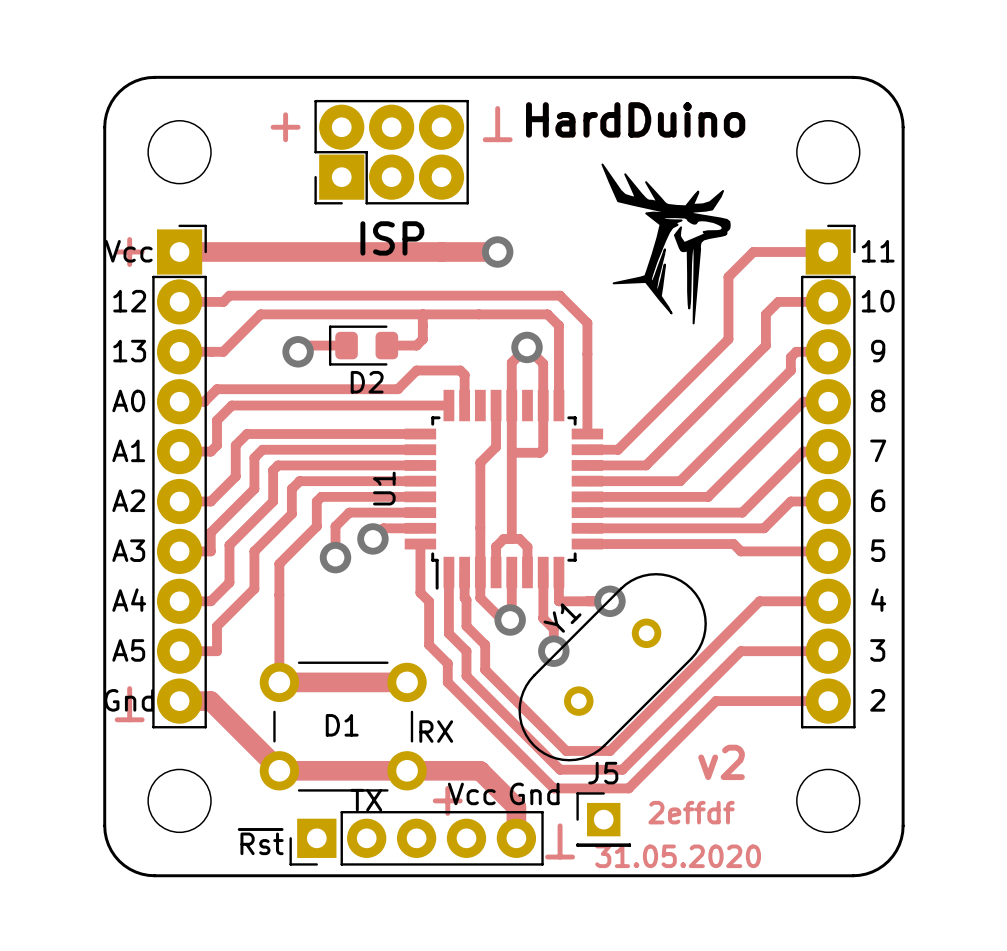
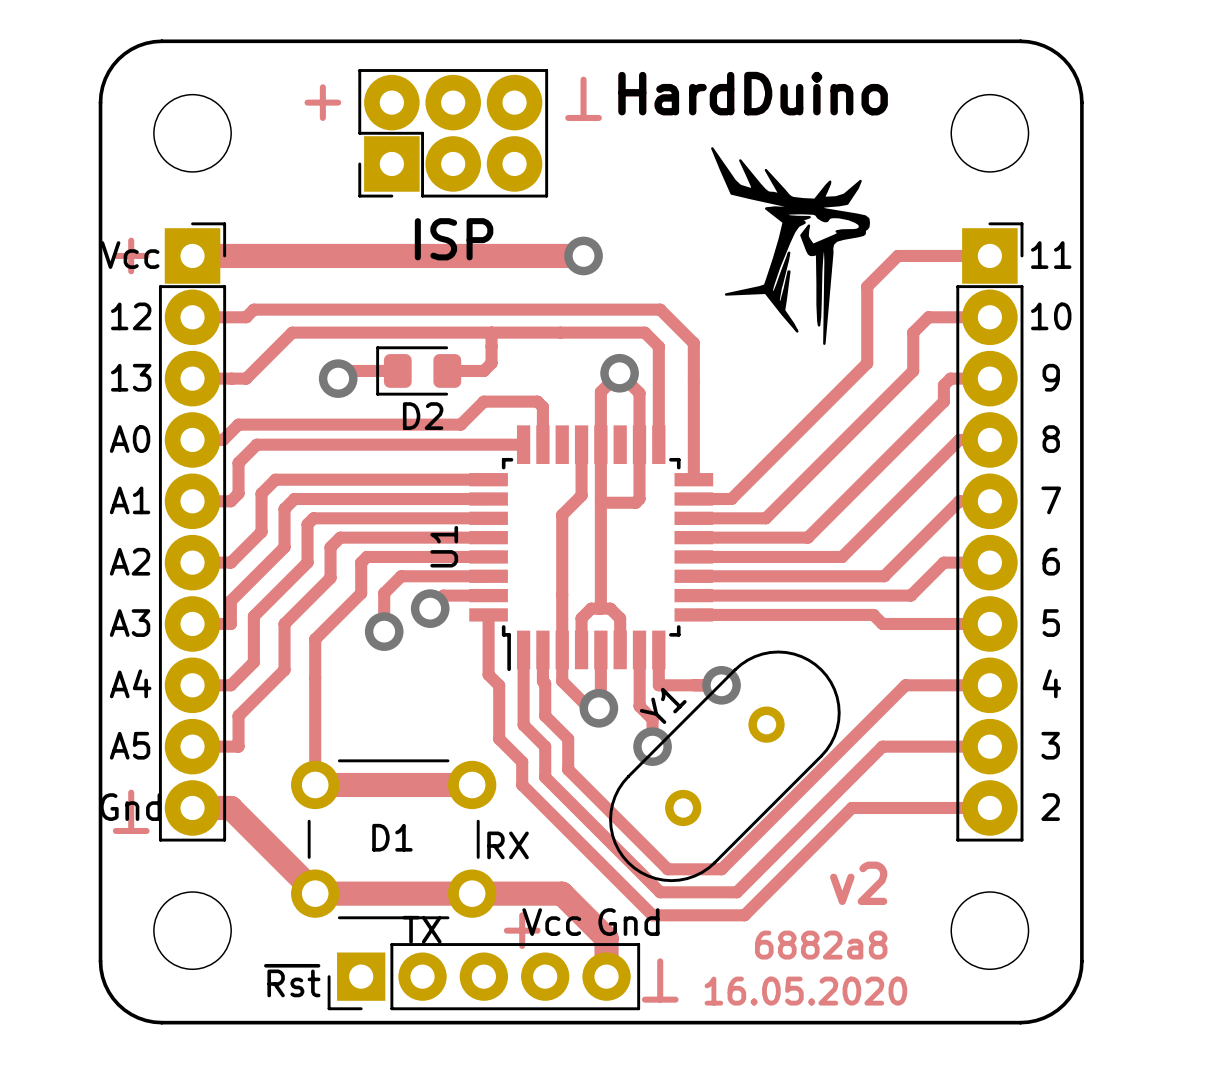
text: 2effdf (691, 812) -> 6882a8 (821, 945)
J5: (603, 819) -> none
text: 31.05.2020 (678, 856) -> 16.05.2020 (805, 991)

